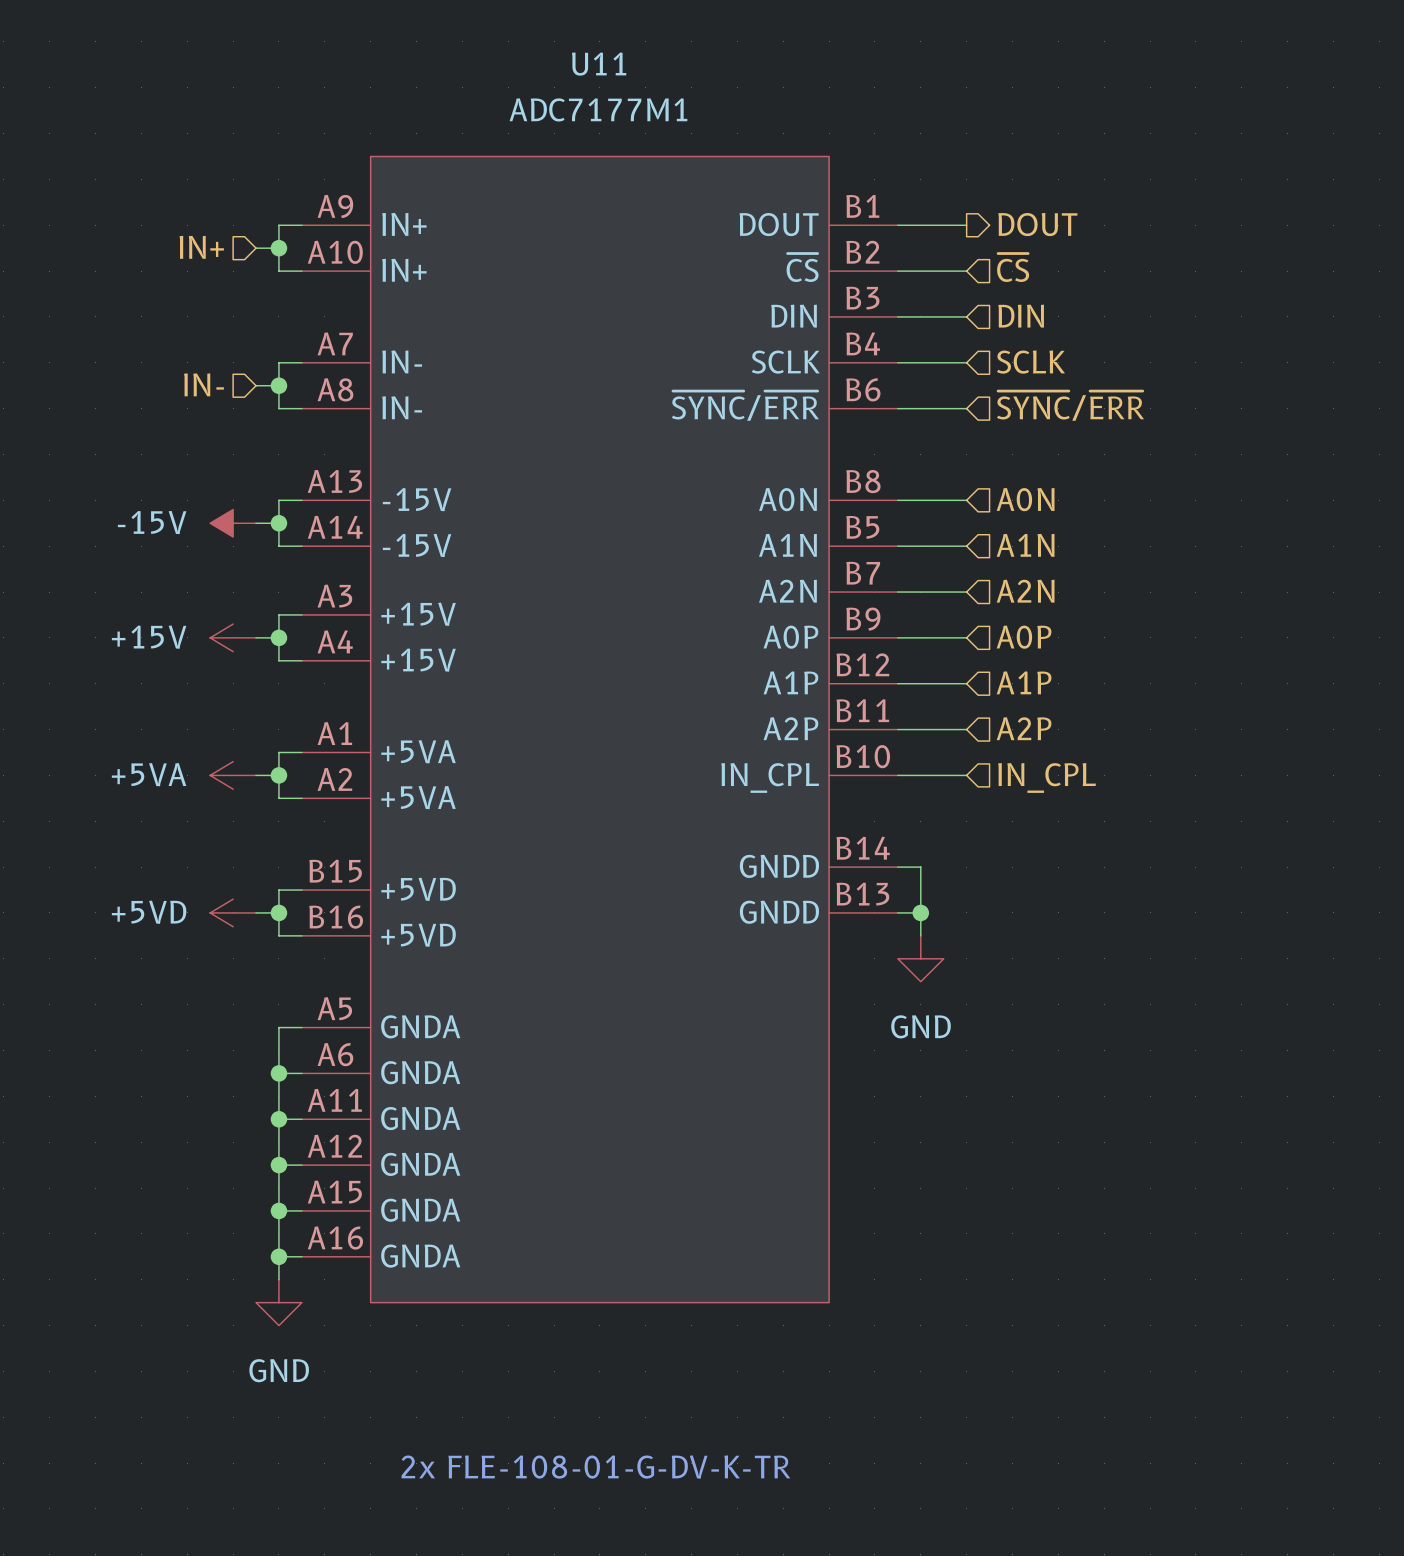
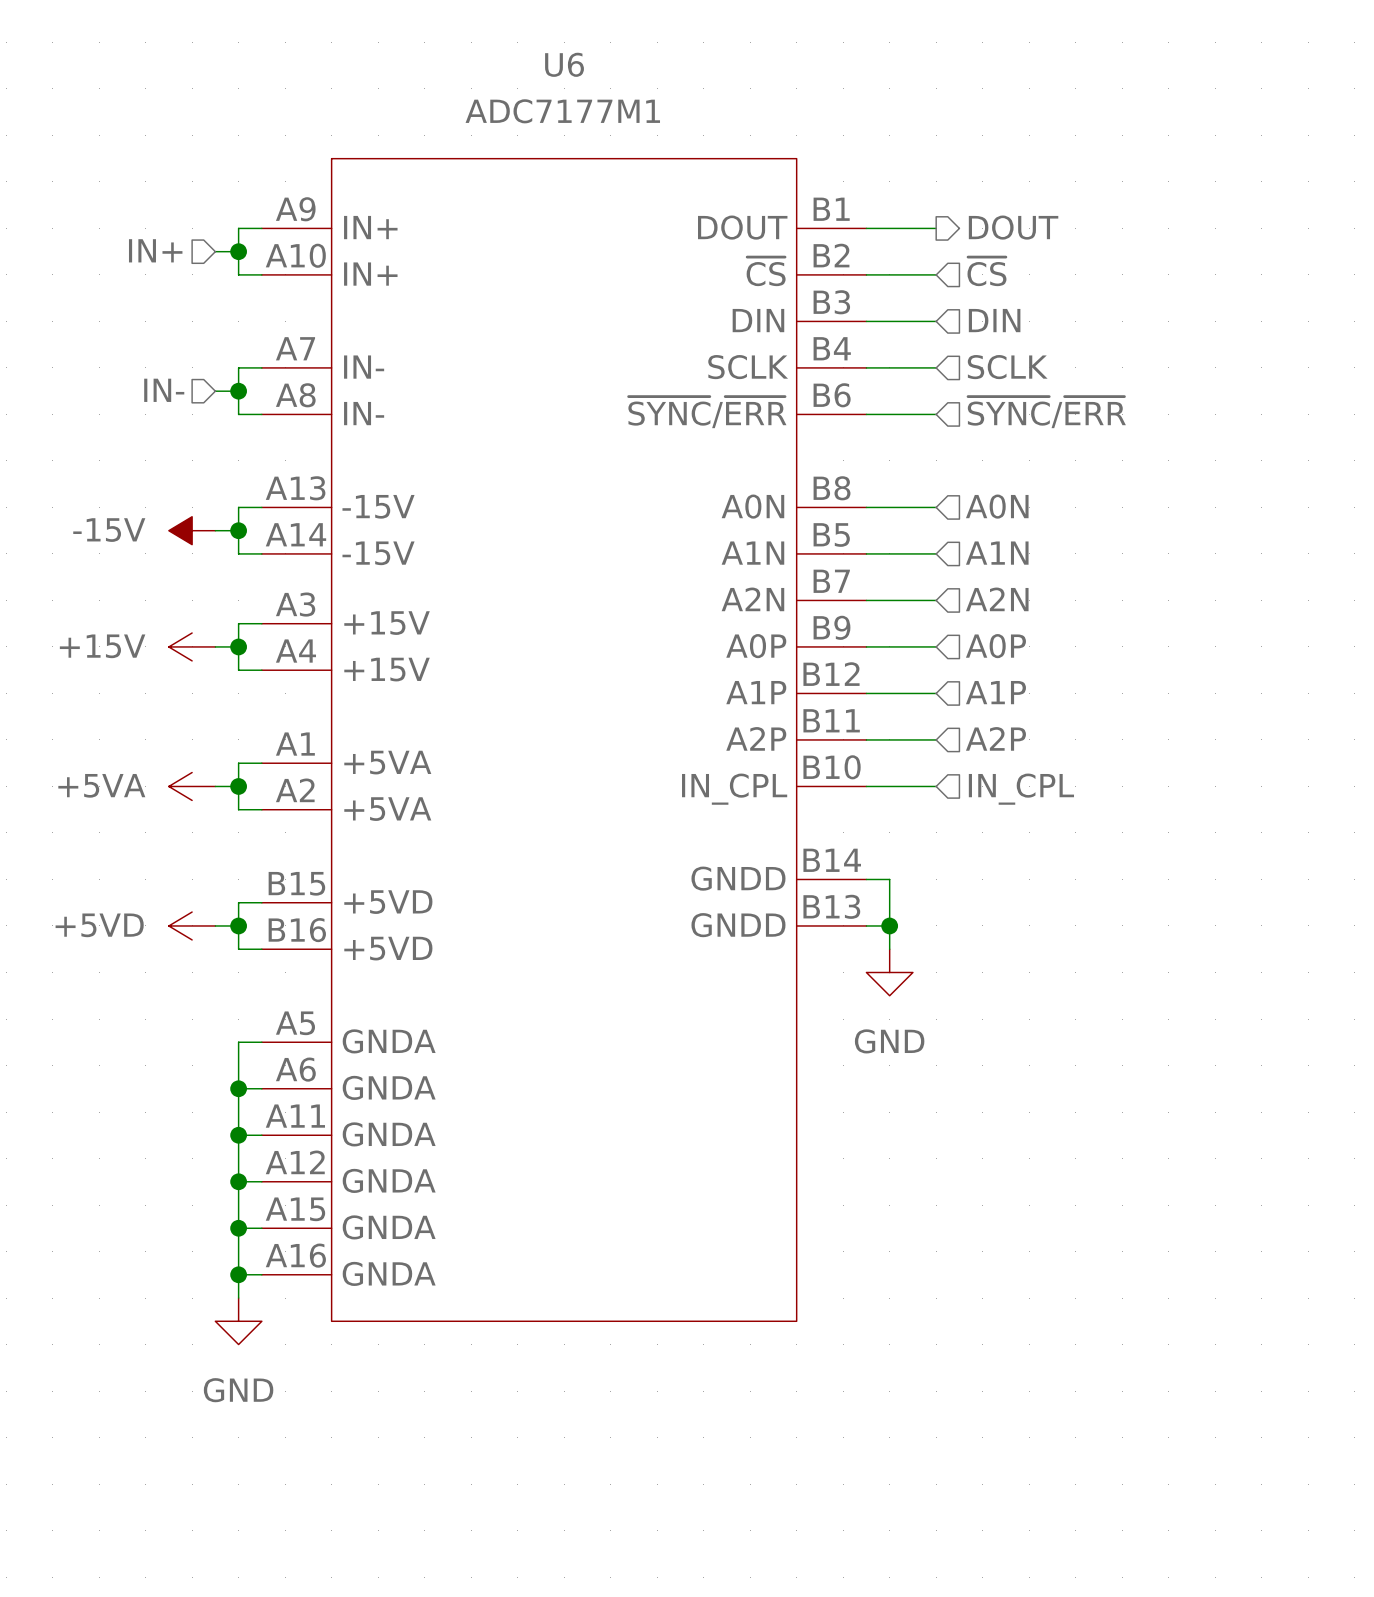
U11 name: U11 (599, 64) -> U6 (564, 64)
text: 2x FLE-108-01-G-DV-K-TR (595, 1467) -> none

